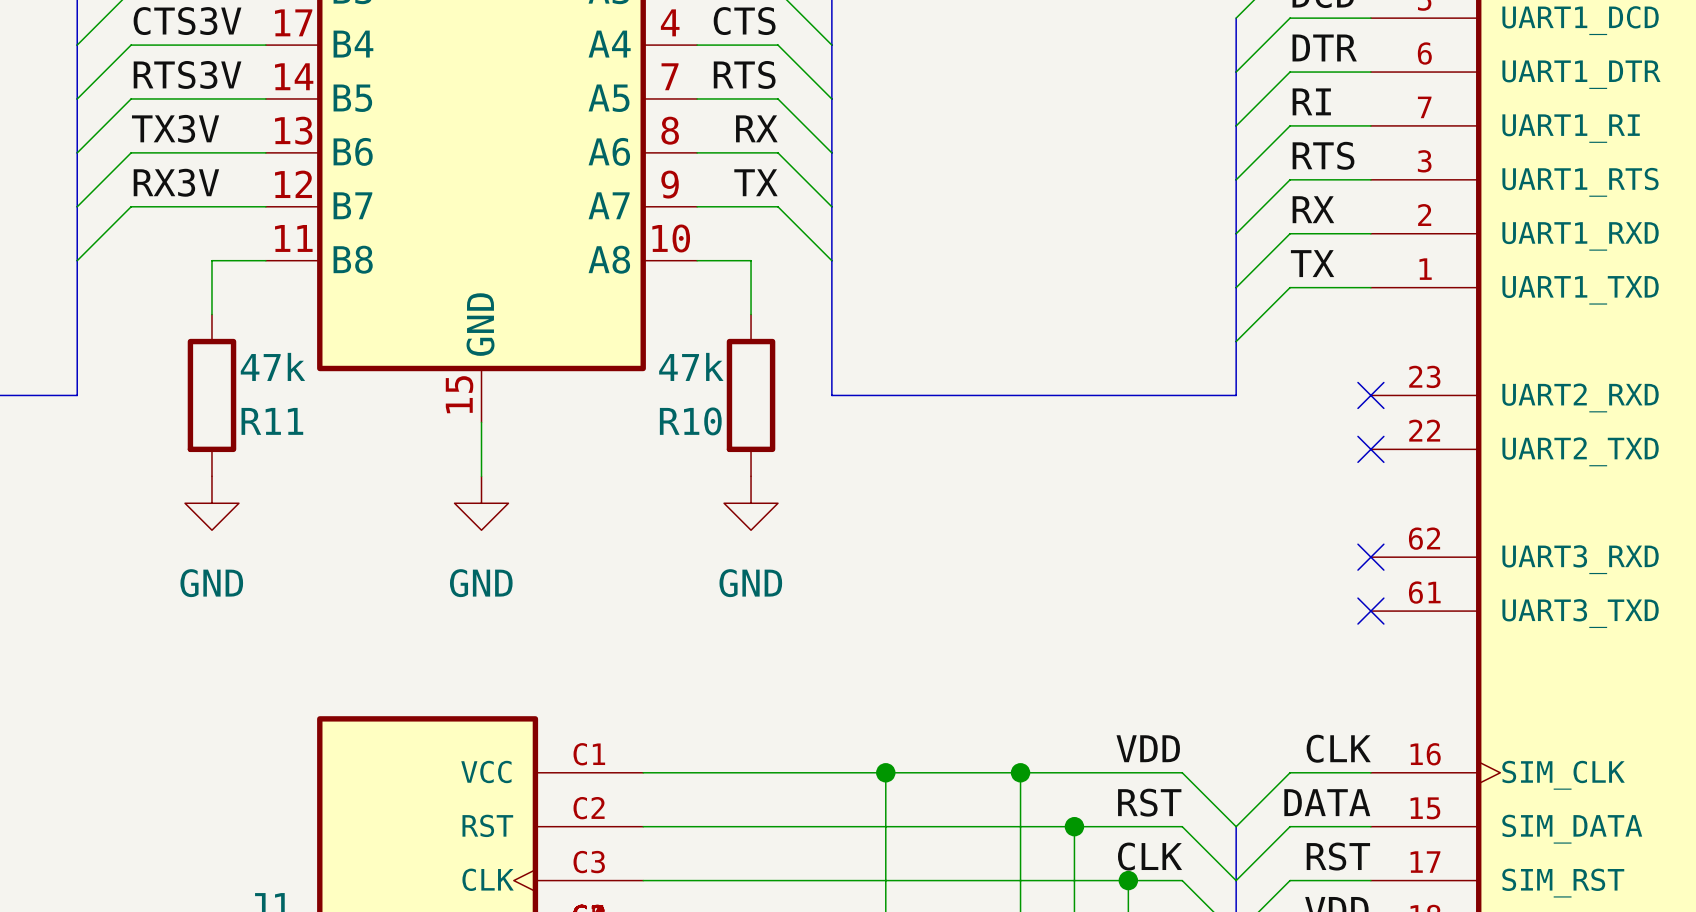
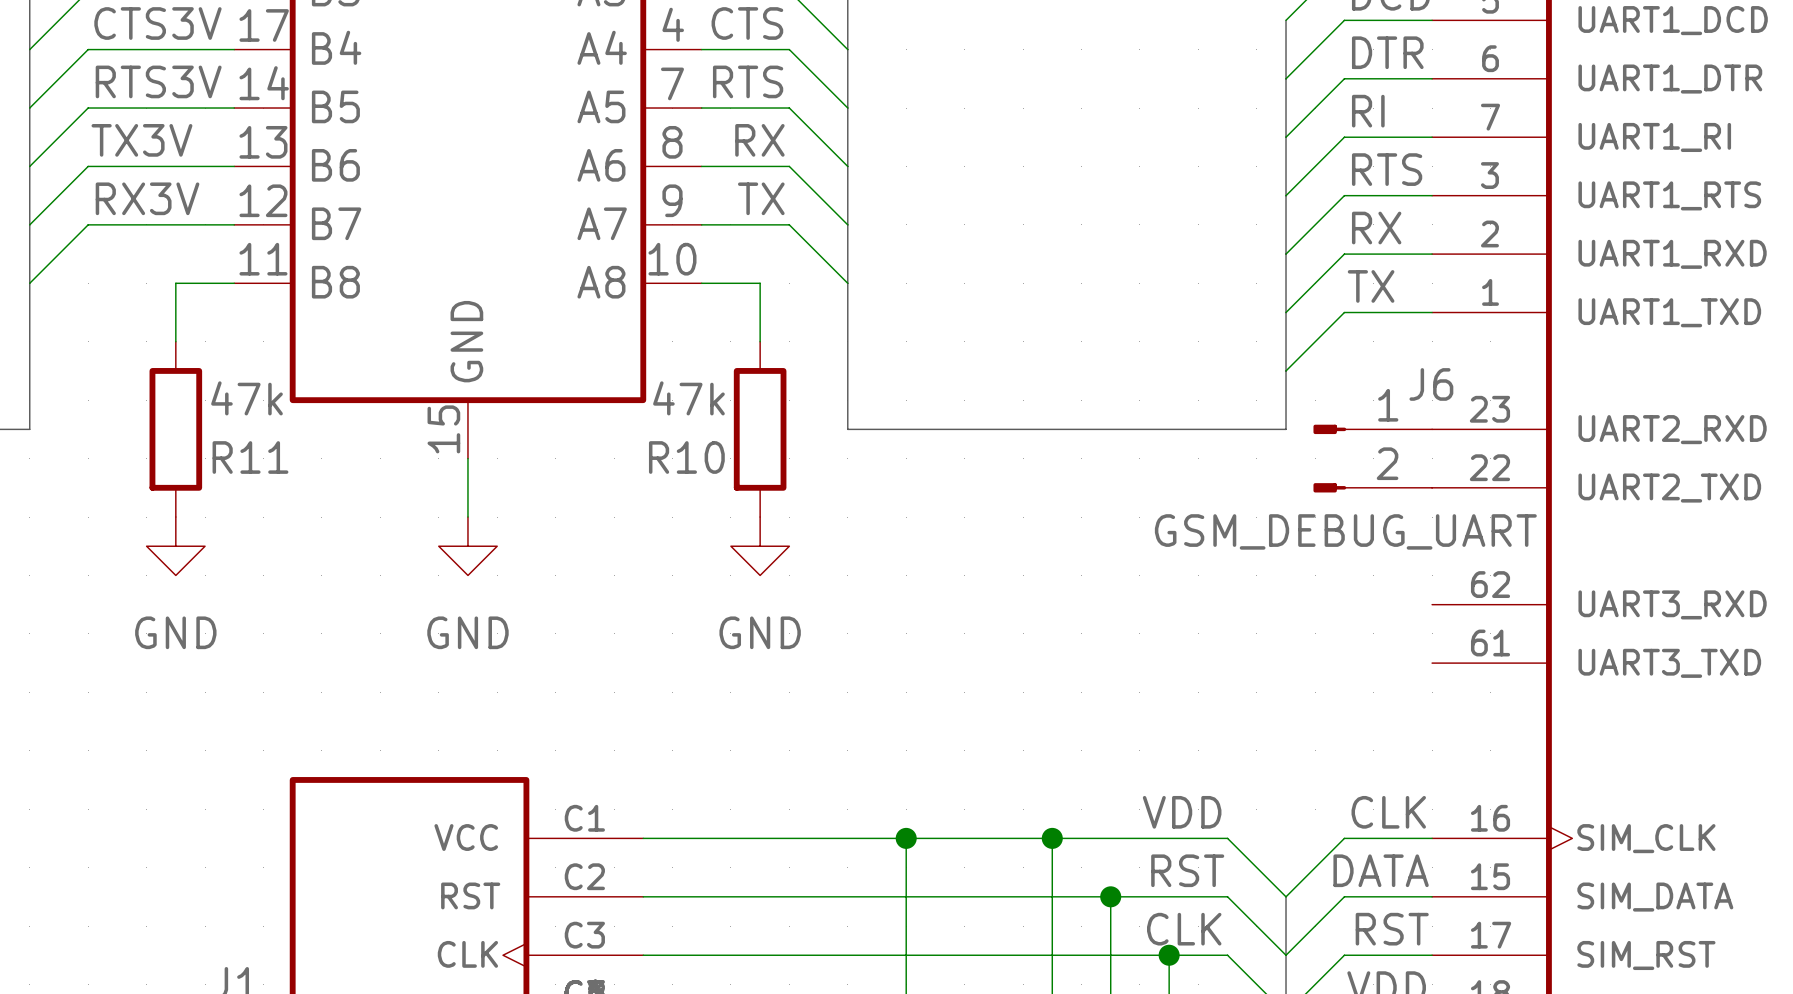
no-connect mark: (1370, 395) -> none
J6: none -> GSM_DEBUG_UART (1372, 458)
no-connect mark: (1370, 449) -> none
no-connect mark: (1370, 557) -> none
no-connect mark: (1370, 611) -> none

